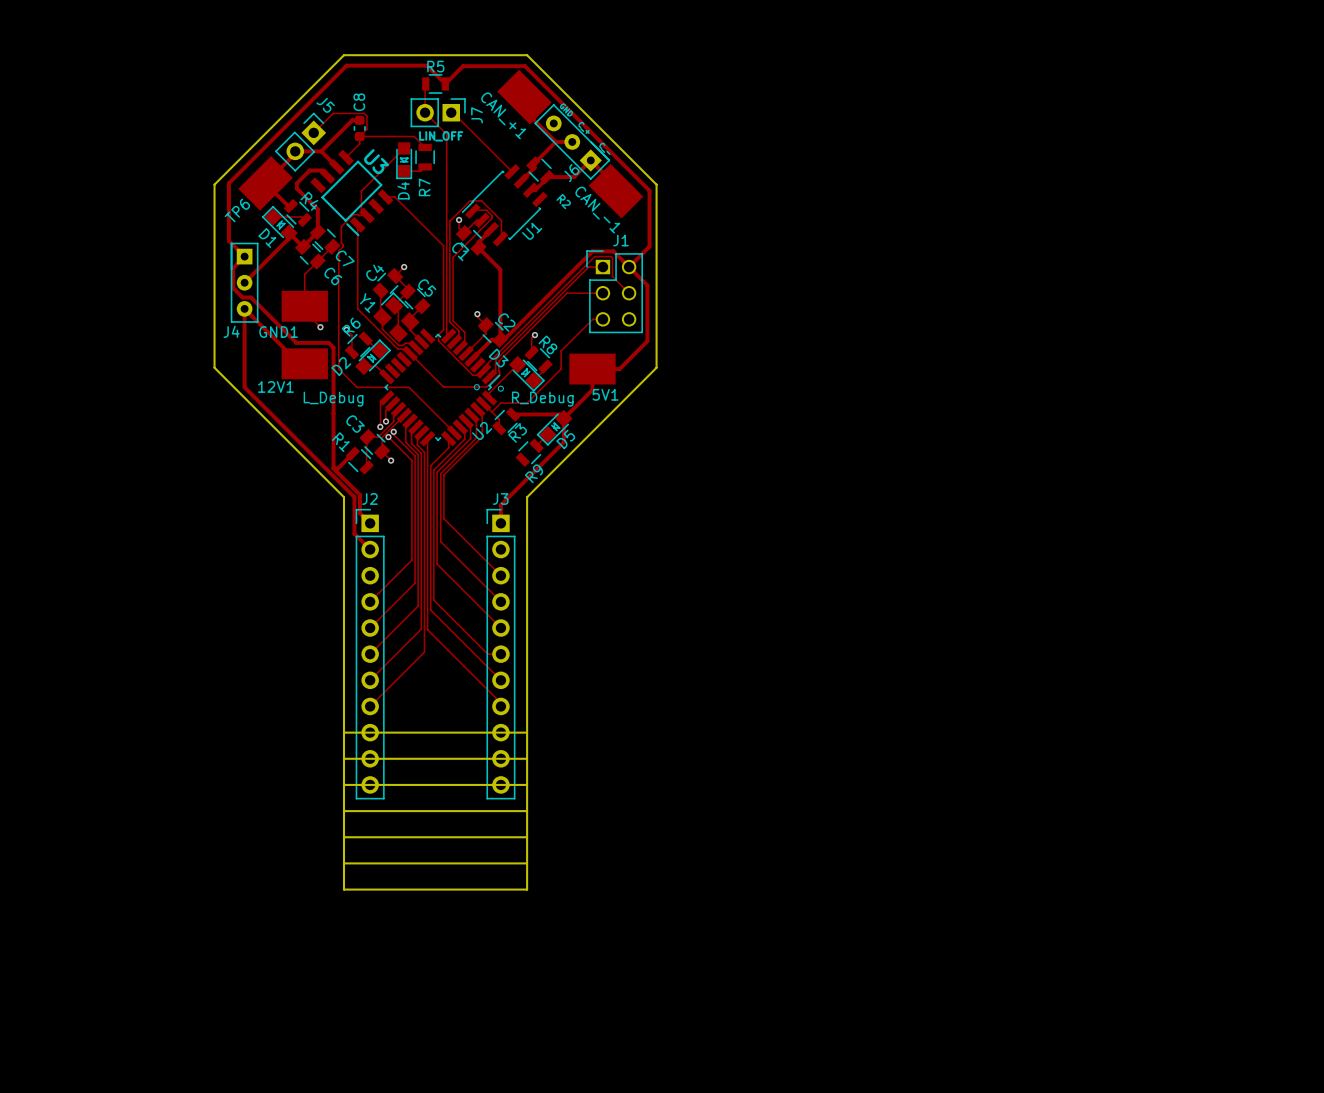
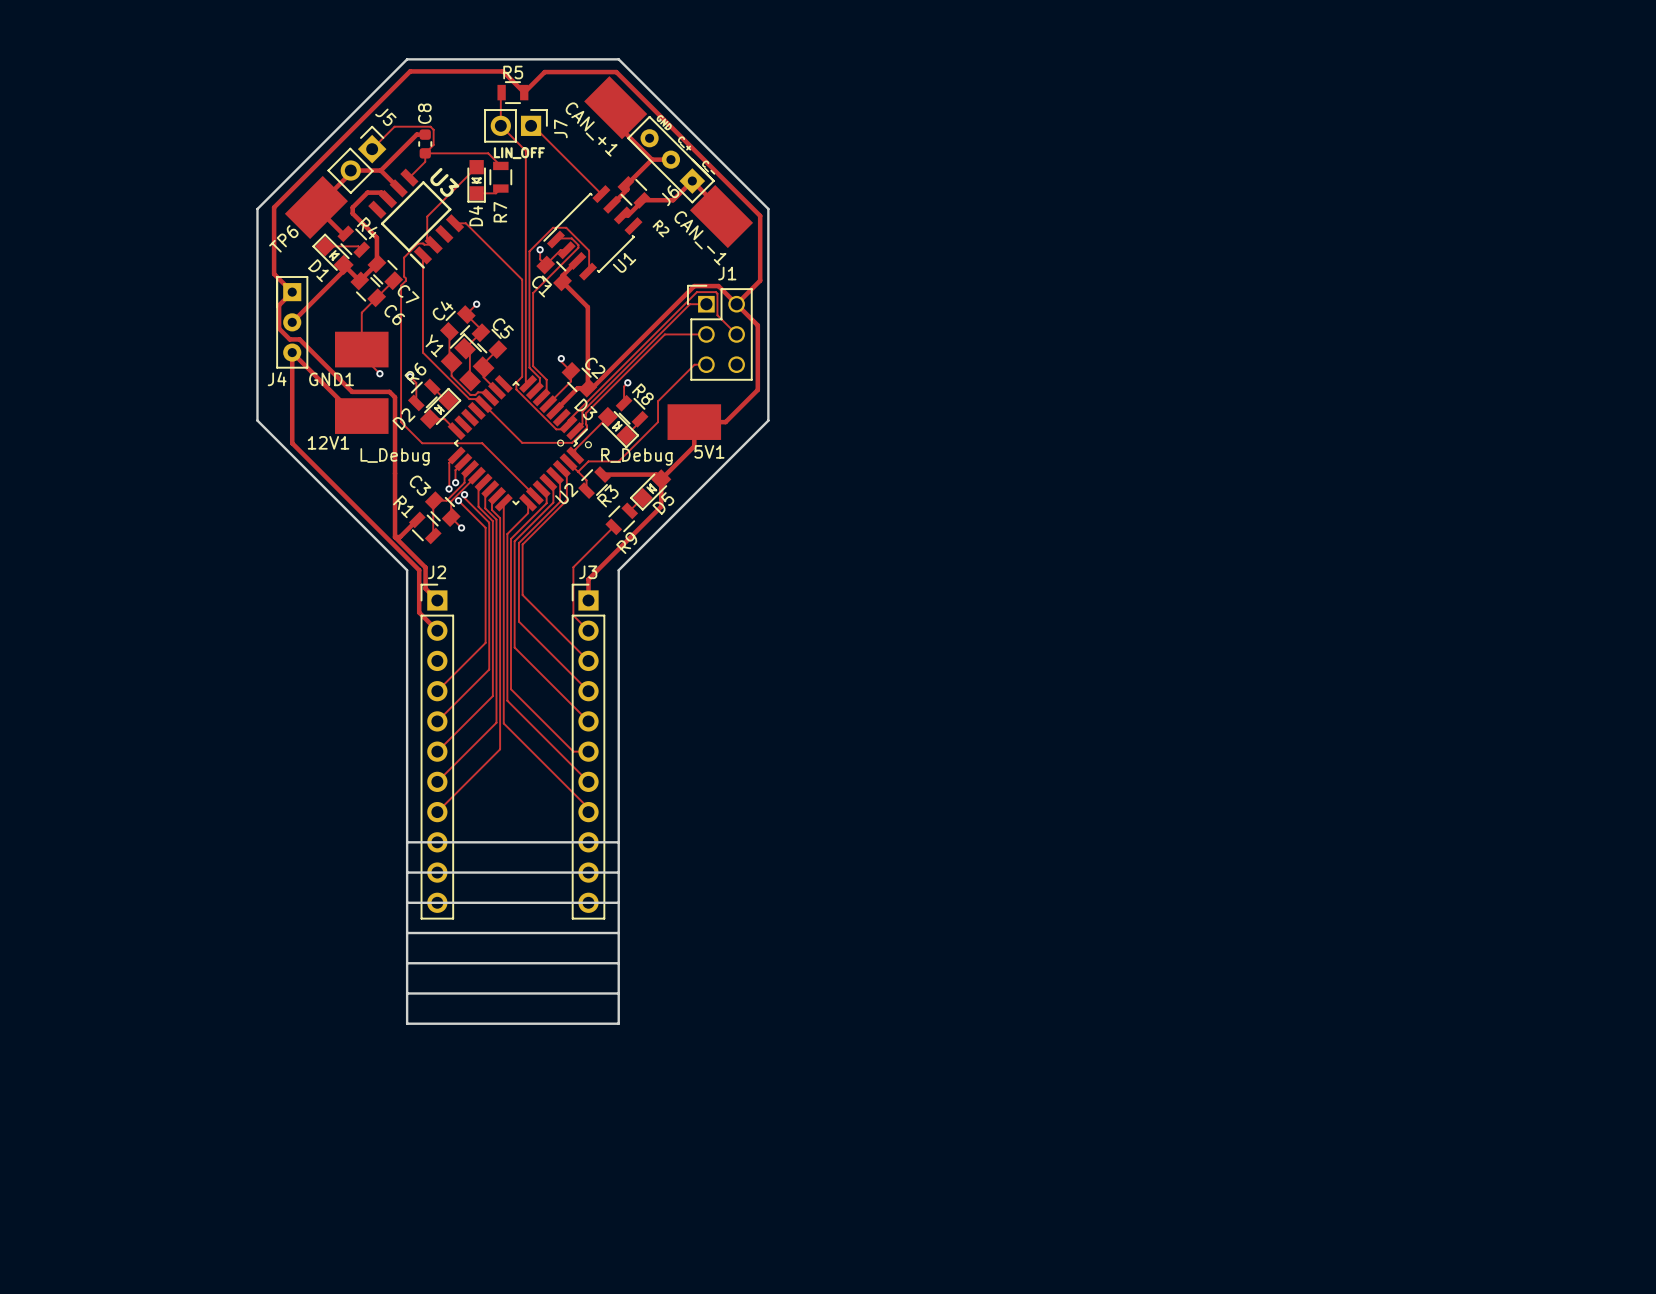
track: none -> (613, 526) (573, 567) (573, 615) (588, 630)

